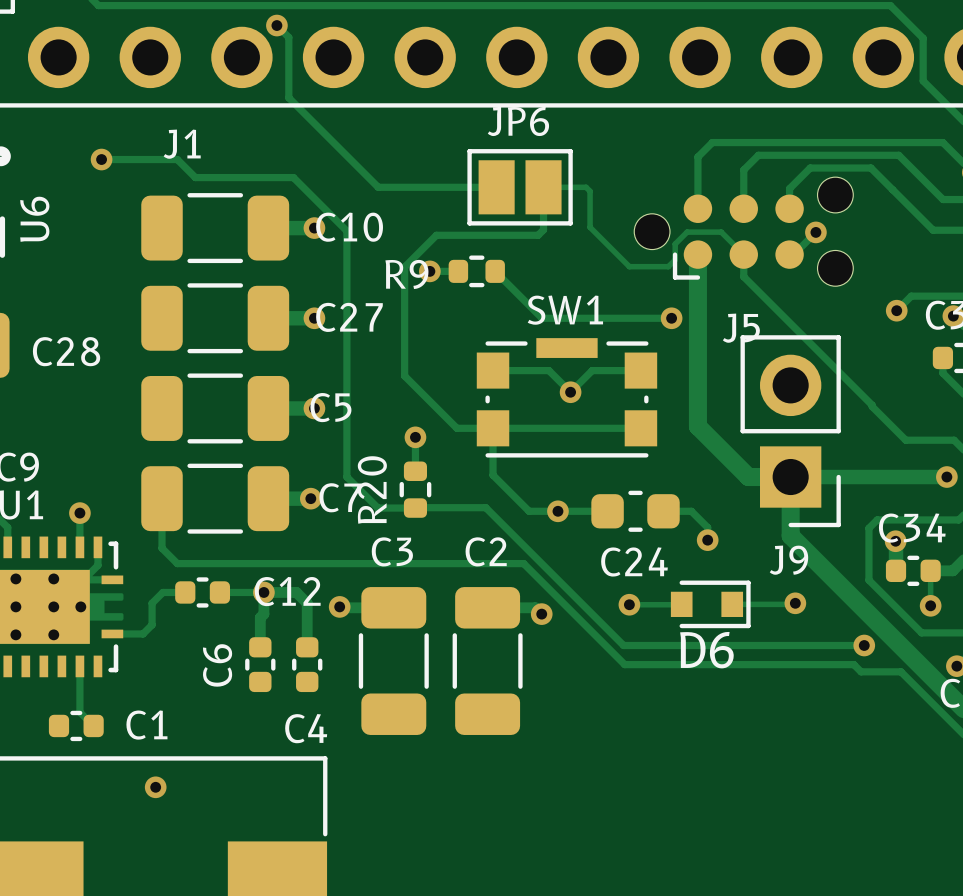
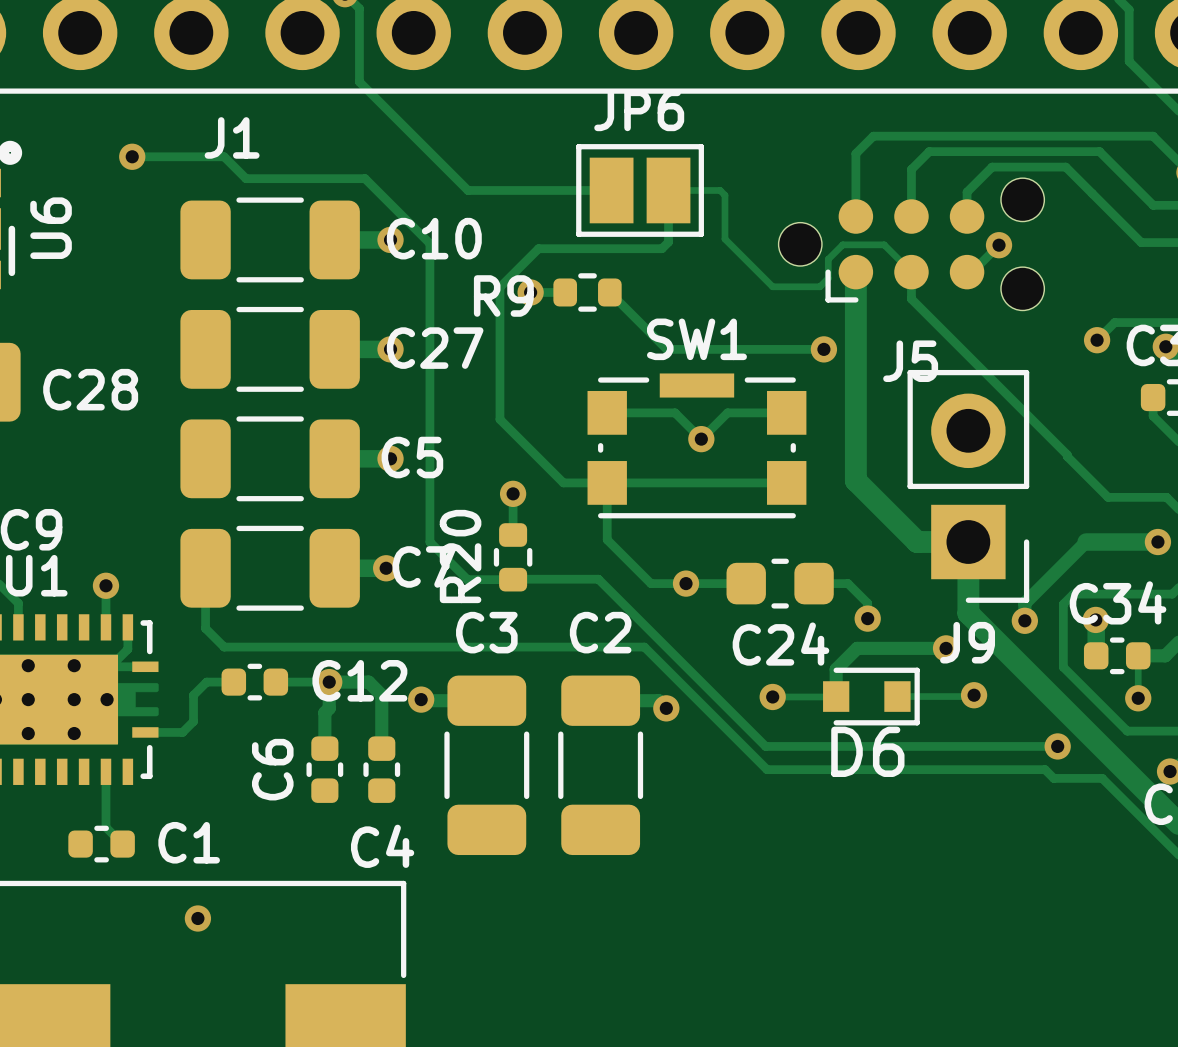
track: (790, 477) (887, 477) -> (1024, 620) (1024, 603) (1086, 542)
via: none -> (1024, 620)
track: none -> (946, 648) (857, 648) (836, 669) (836, 696)
via: none -> (946, 648)

